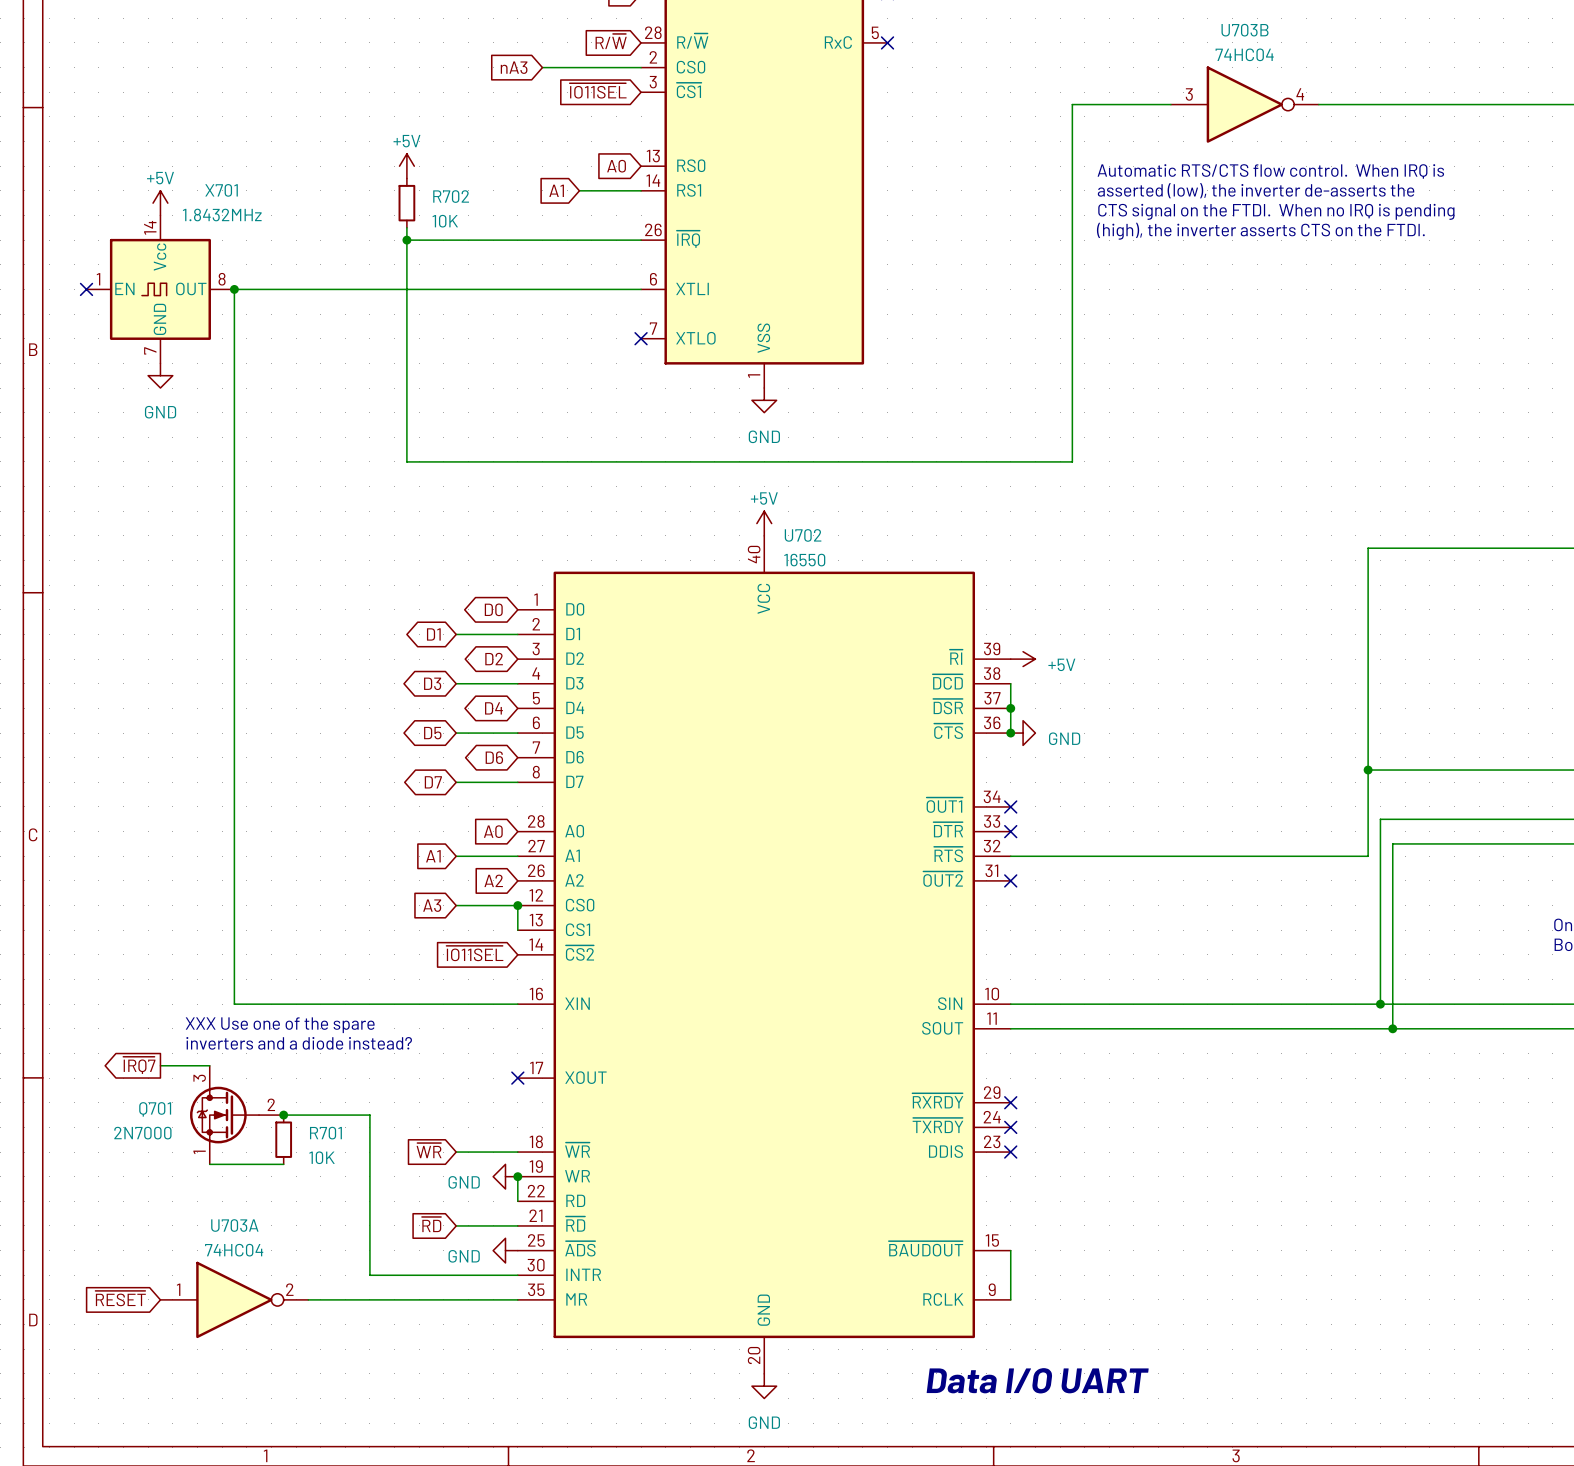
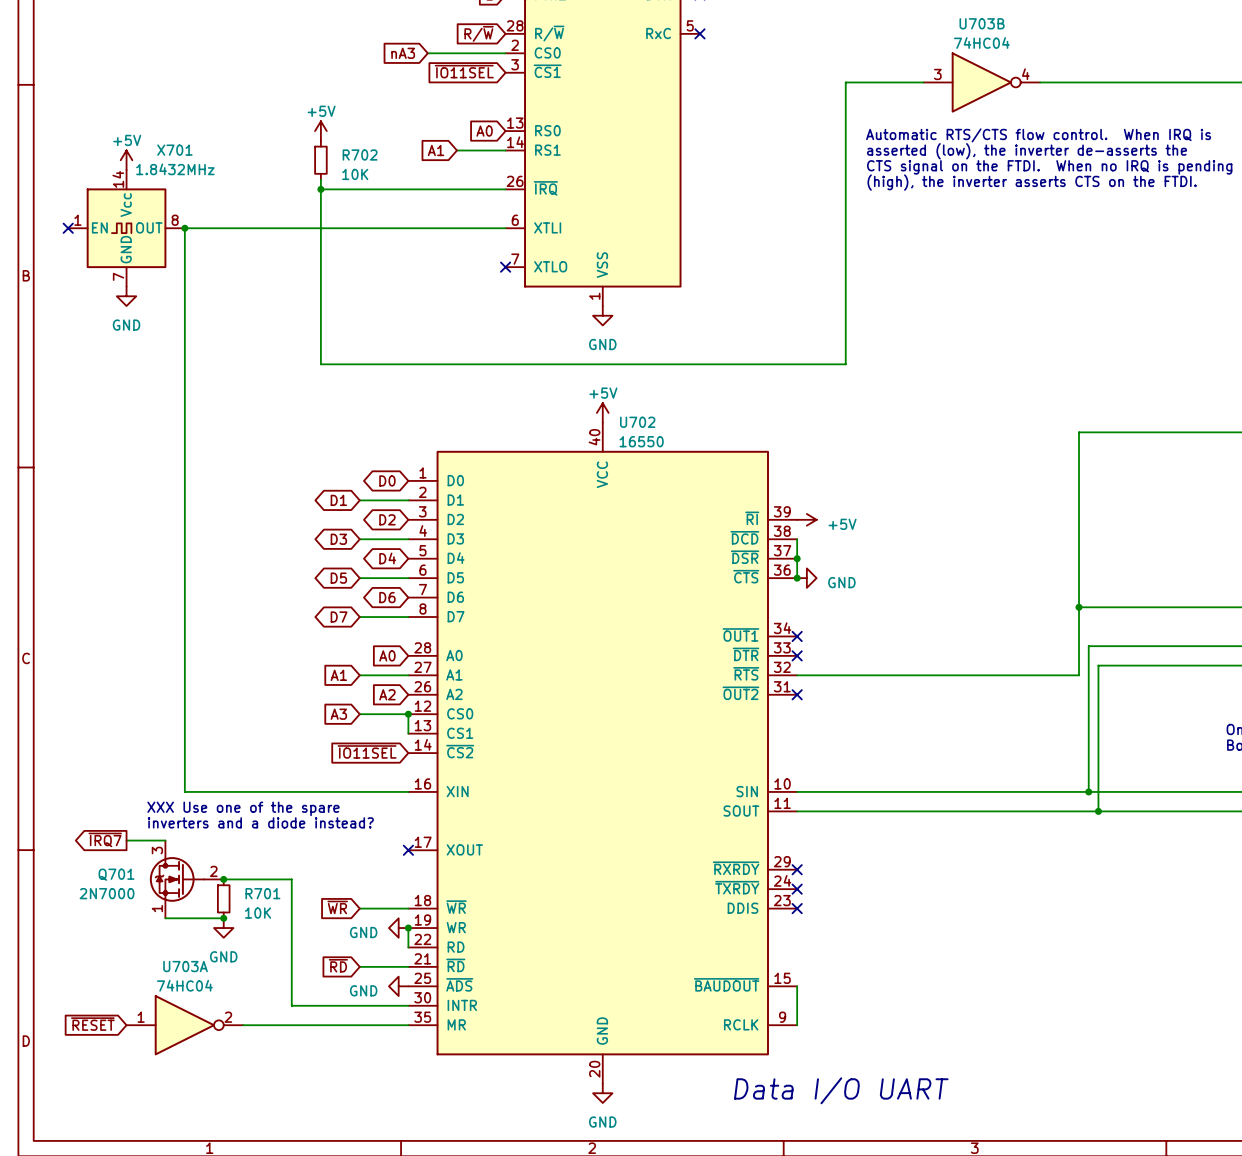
junction: none -> (223, 918)
power symbol: none -> GND (223, 928)

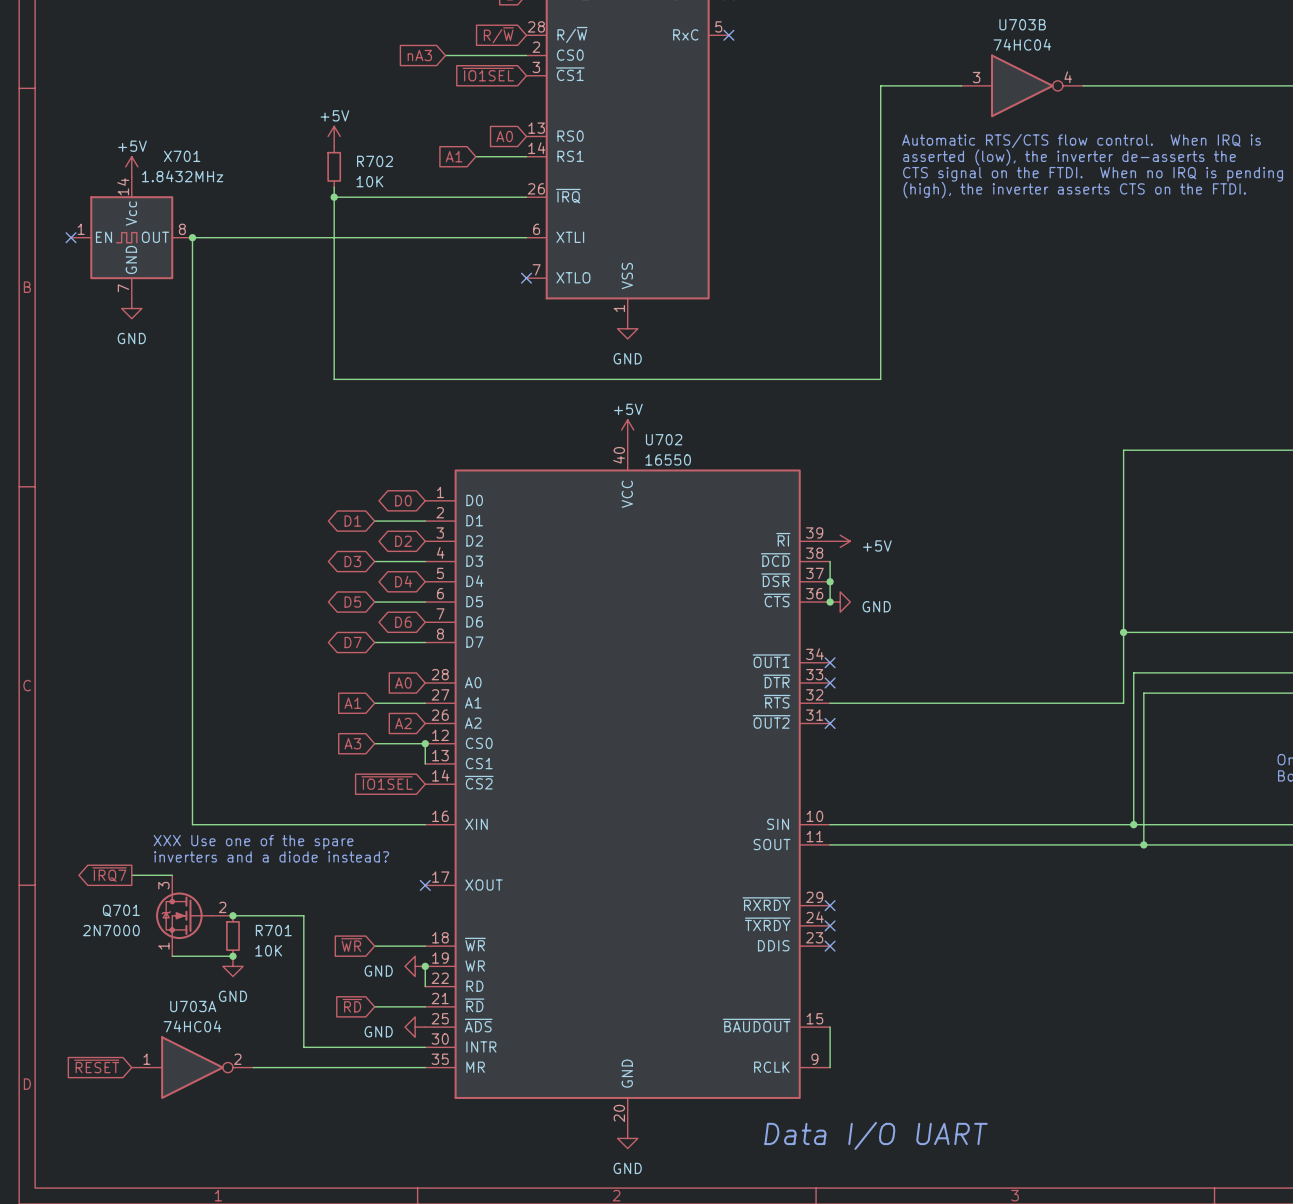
global label: ~{IO11SEL} (464, 71) -> ~{IO1SEL} (488, 74)
global label: ~{IO11SEL} (367, 751) -> ~{IO1SEL} (387, 783)

